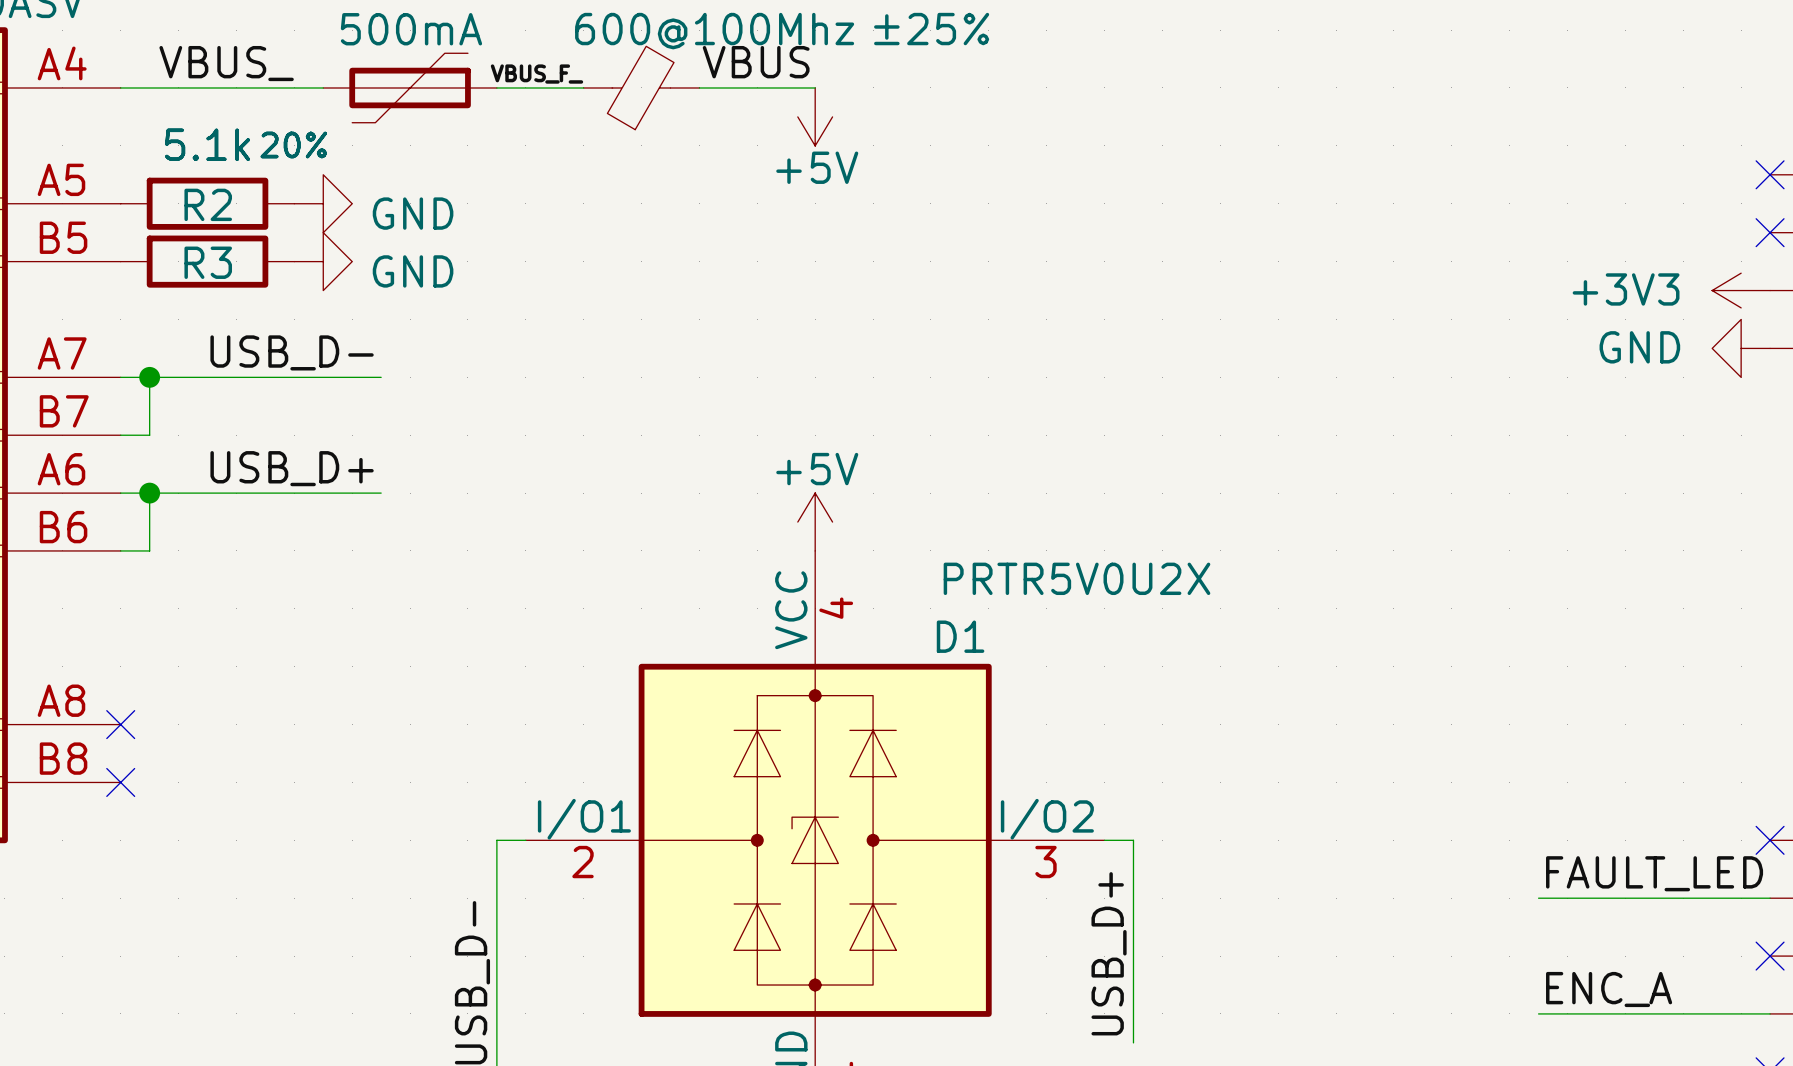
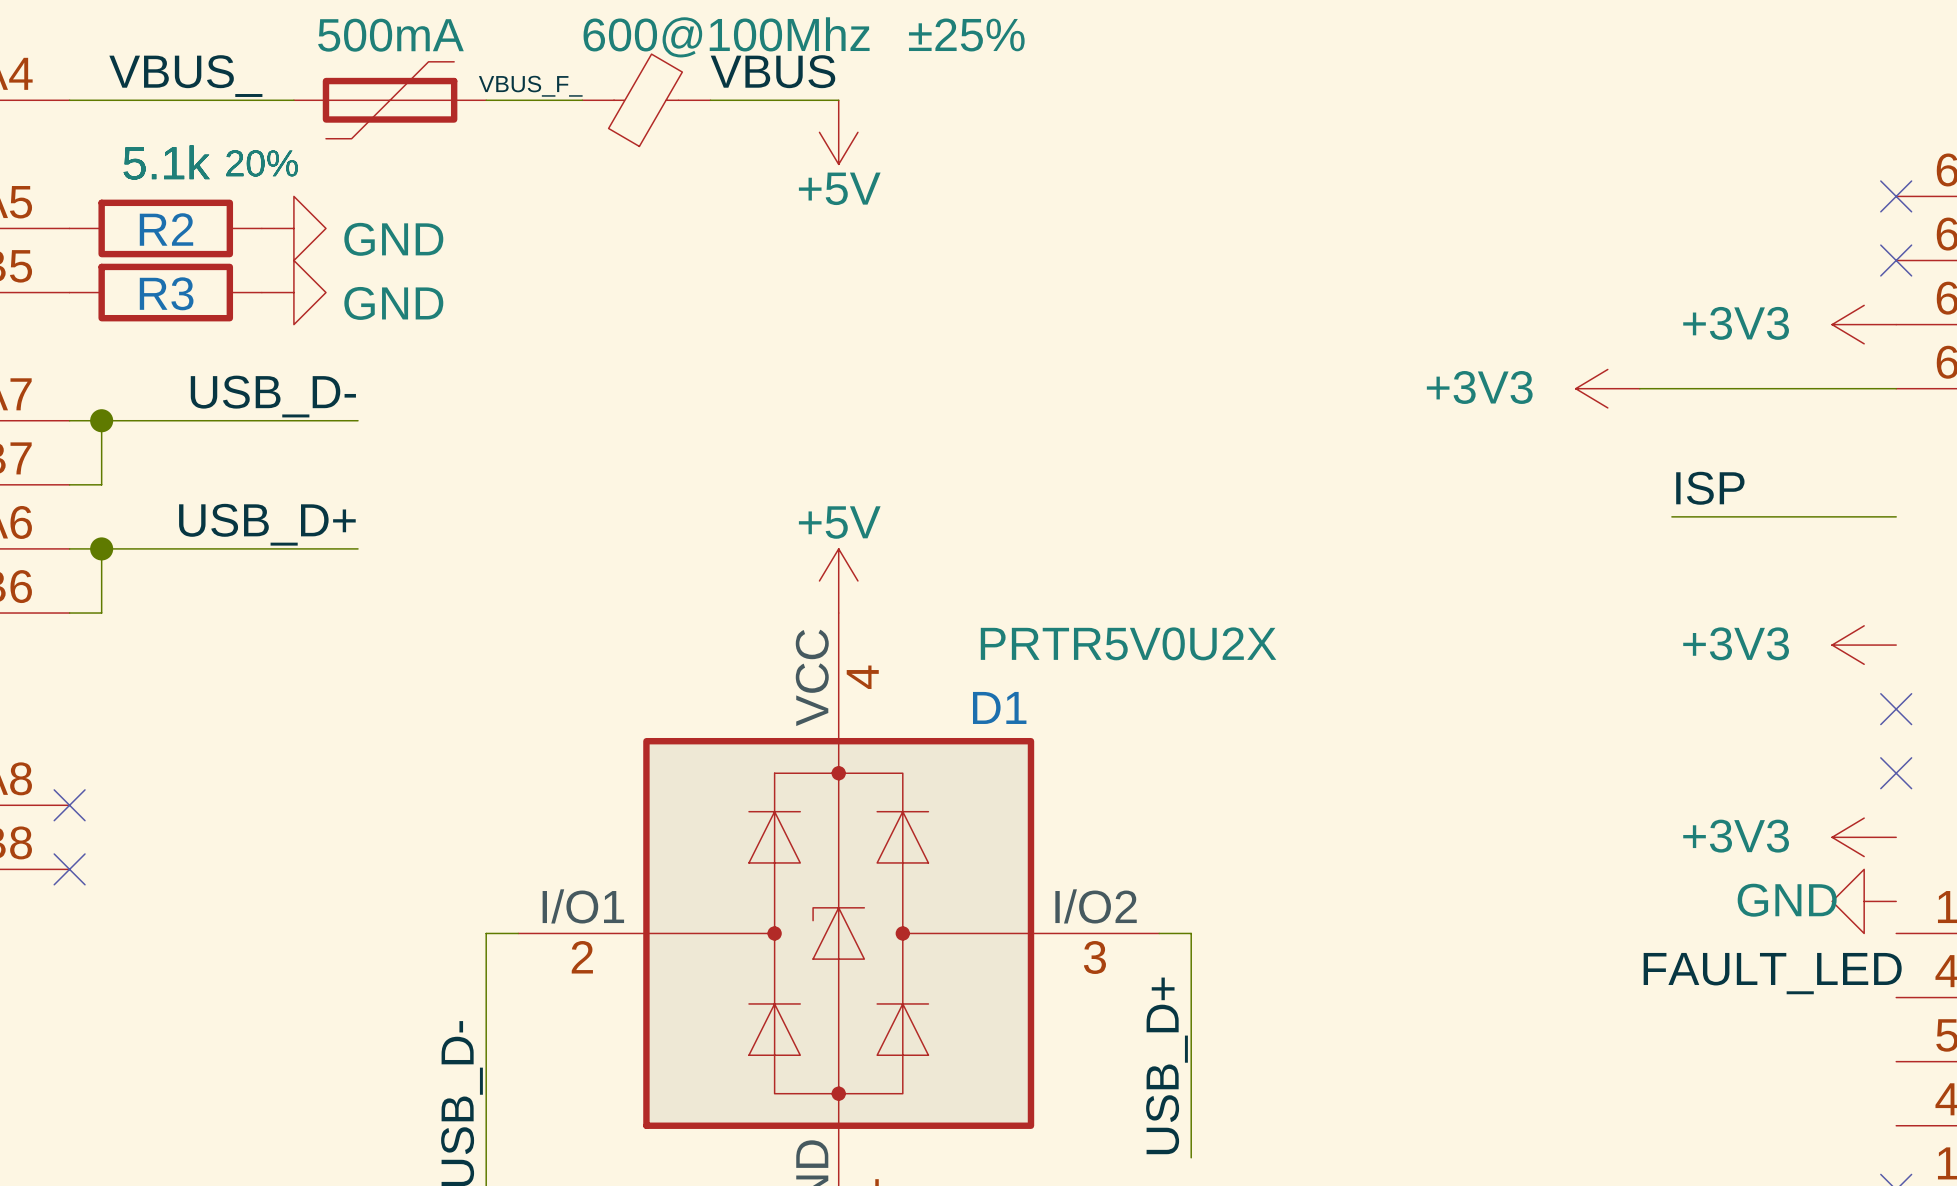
power symbol: none -> +3V3 (1607, 388)
power symbol: GND (1741, 348) -> none
label: none -> ISP (1710, 488)
wire: none -> (1671, 516) (1896, 516)
power symbol: none -> +3V3 (1864, 645)
no-connect mark: none -> (1896, 709)
no-connect mark: none -> (1896, 773)
power symbol: none -> +3V3 (1864, 837)
power symbol: none -> GND (1864, 901)
no-connect mark: (1770, 840) -> none
wire: (1538, 898) (1770, 898) -> (1639, 388) (1896, 388)
no-connect mark: (1770, 956) -> none
label: ENC_A (1609, 989) -> none
wire: (1538, 1013) (1770, 1013) -> none

